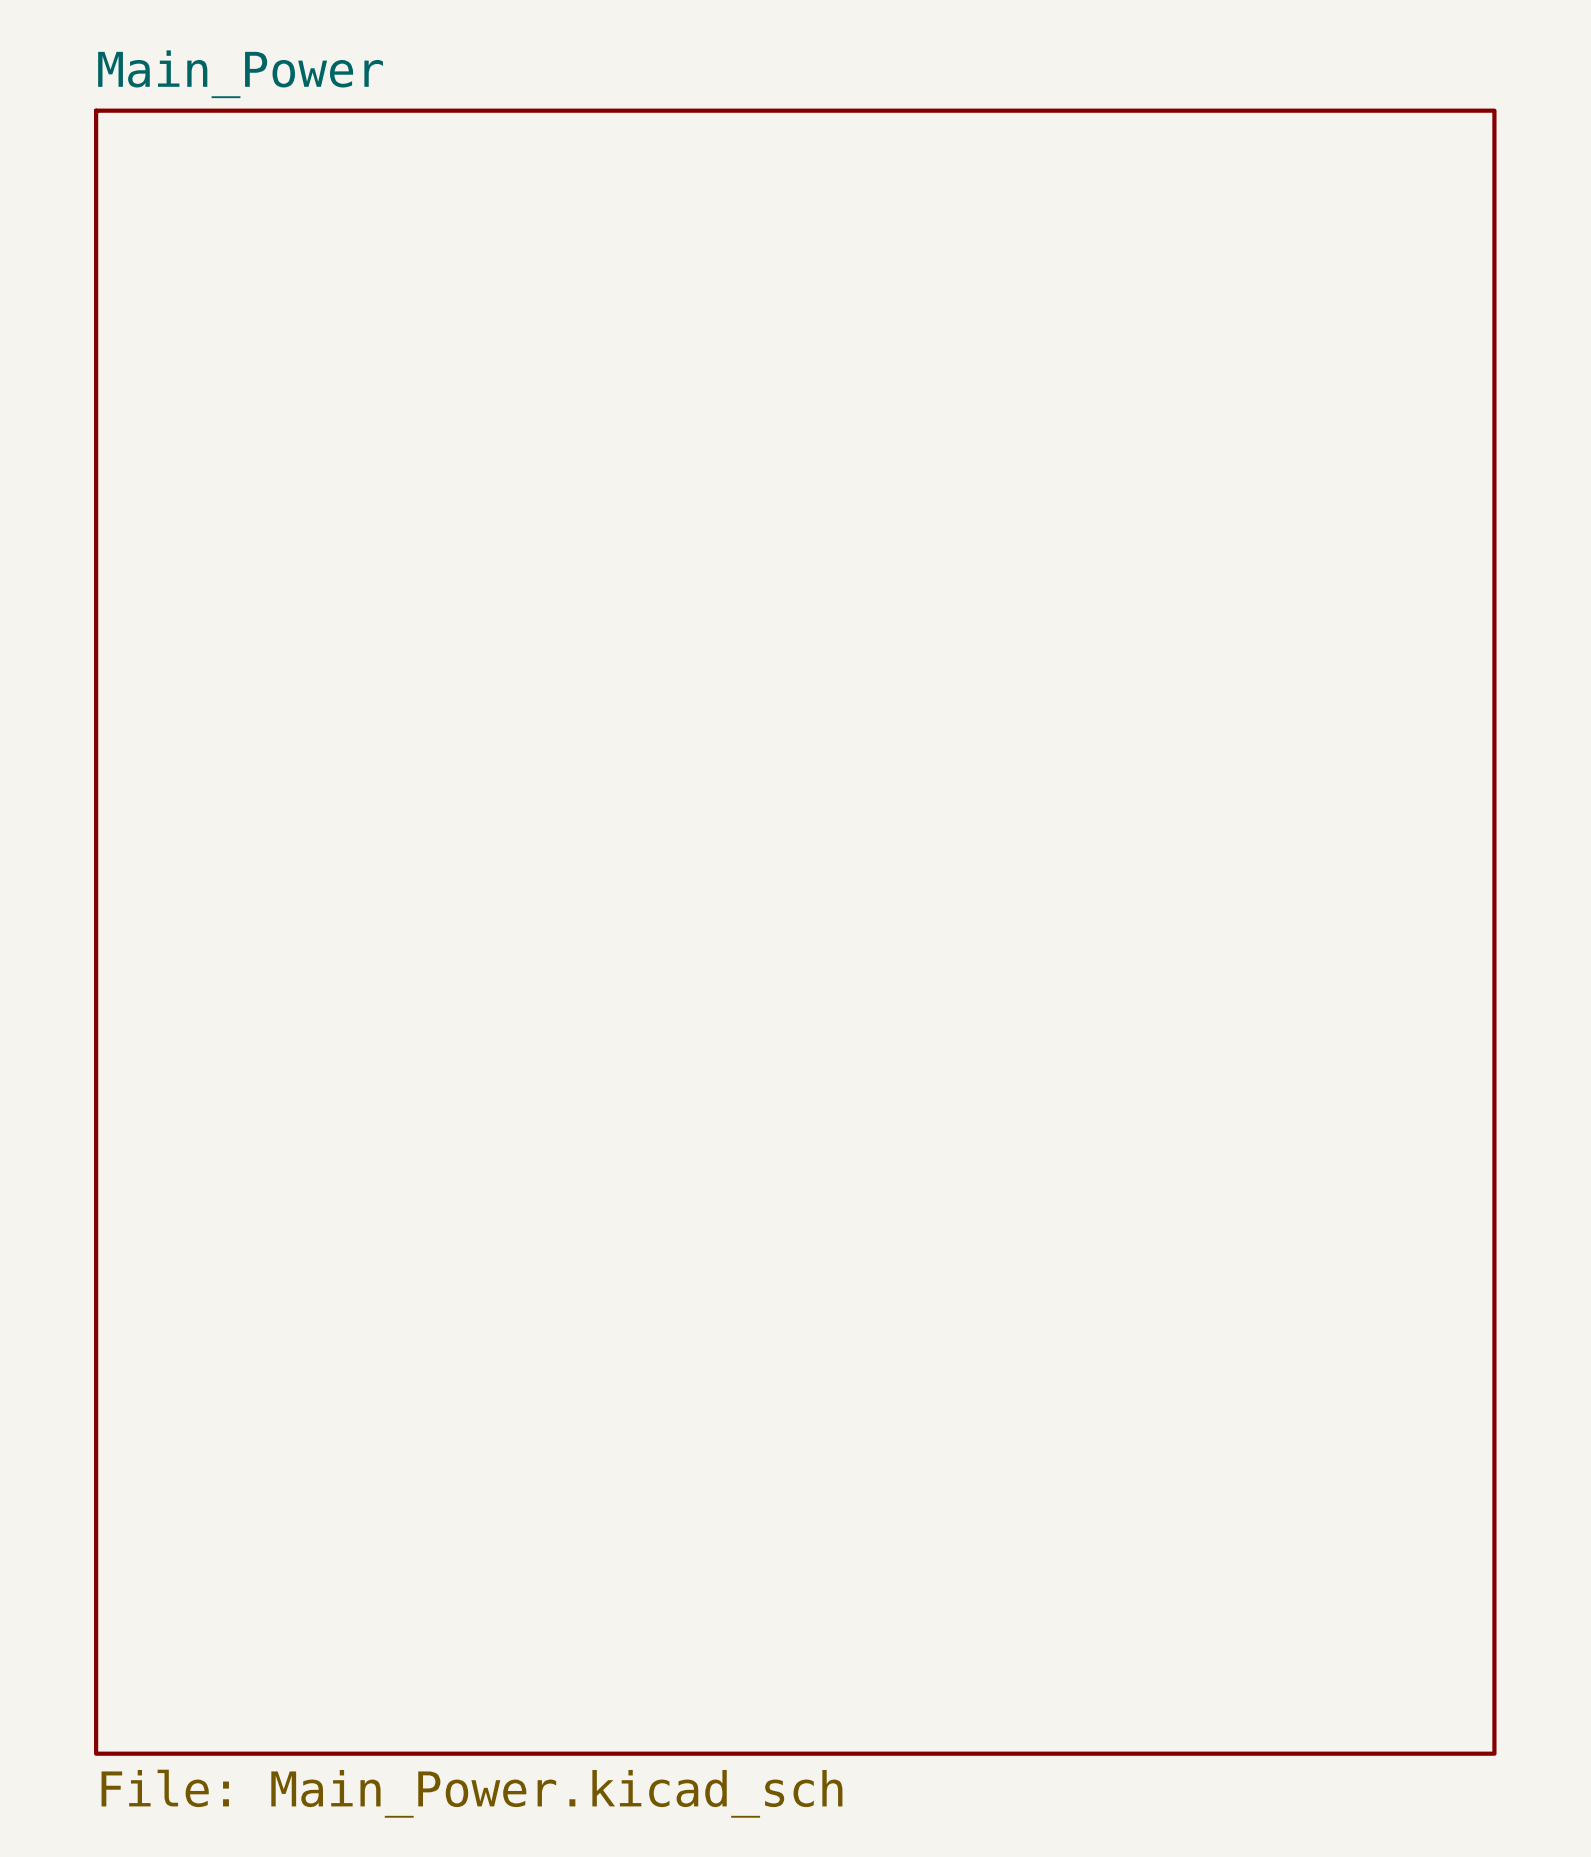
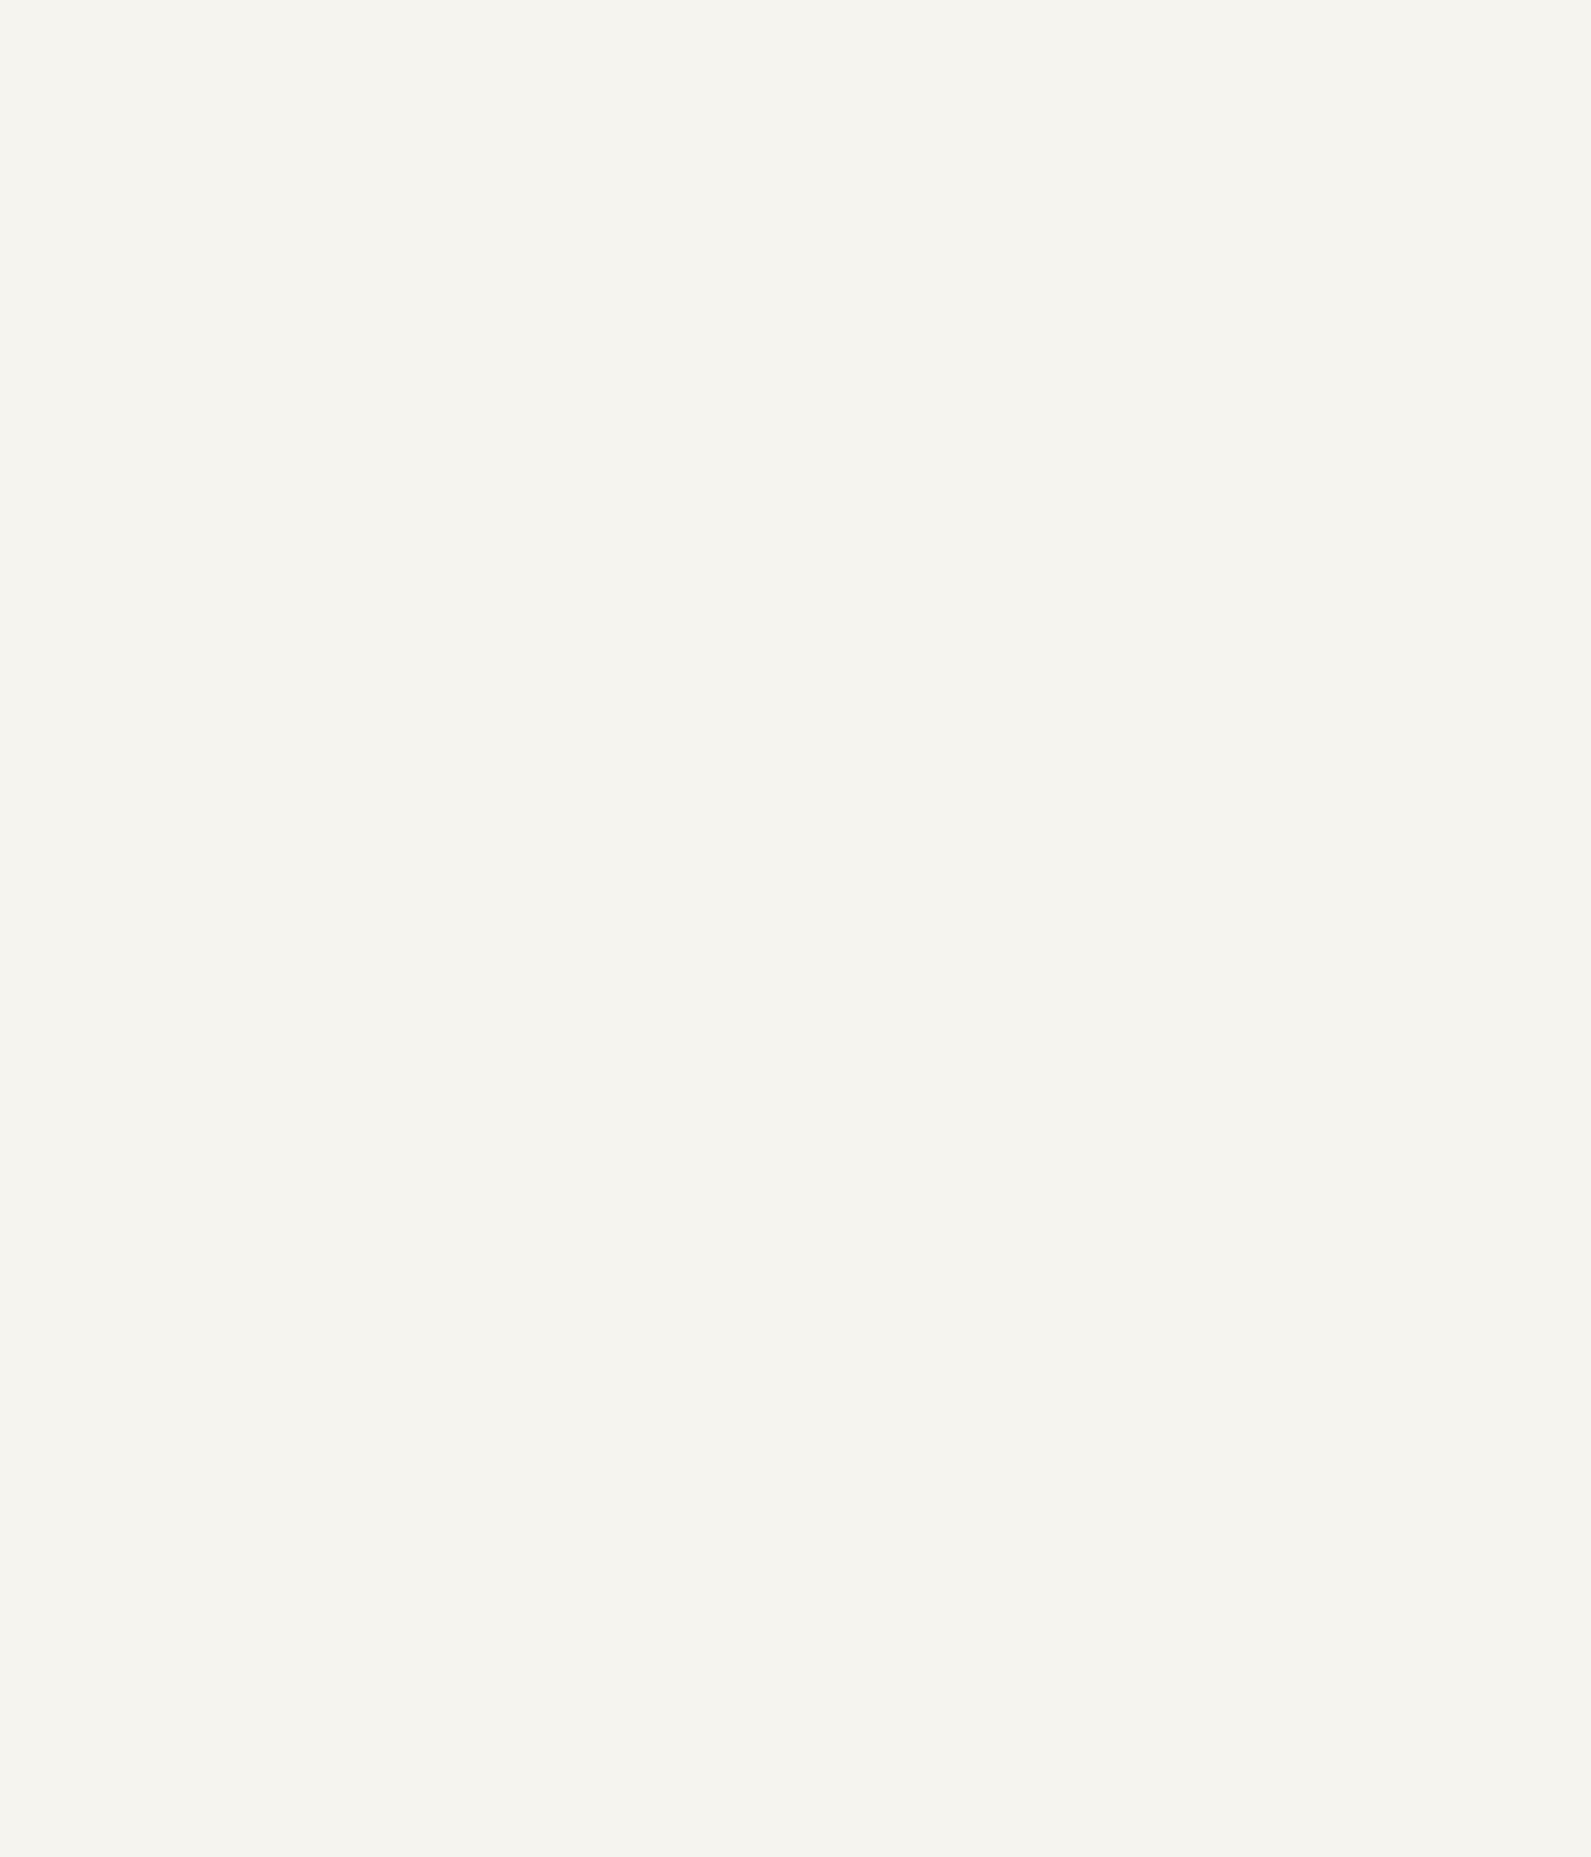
sheet Main_Power: File: Main_Power.kicad_sch (795, 932) -> none

